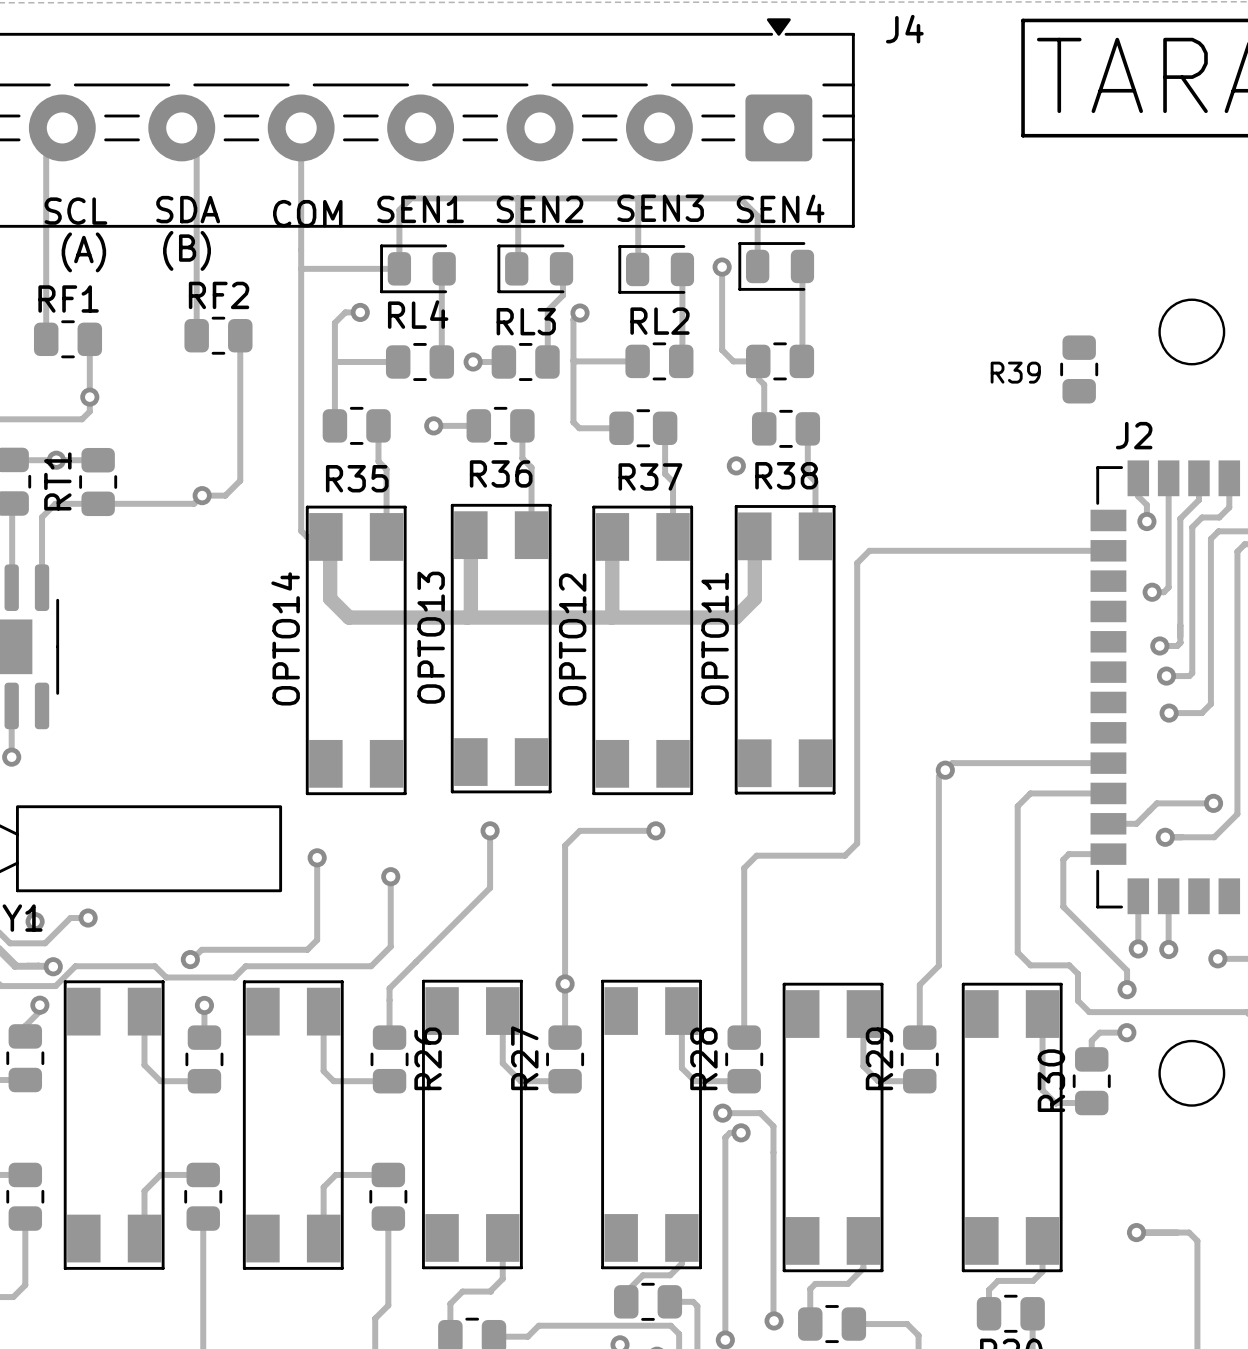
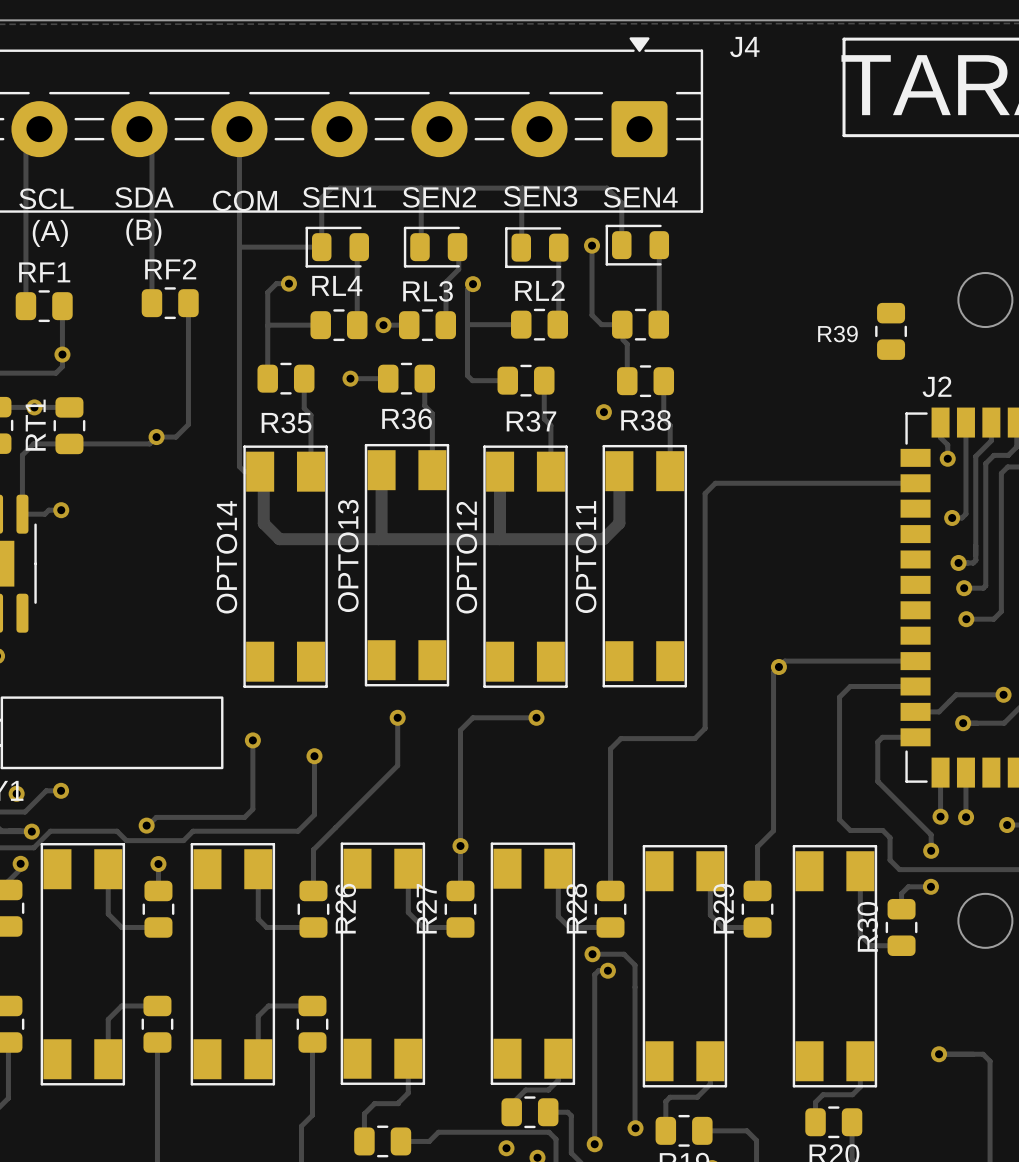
track: none -> (61, 510) (48, 510) (44, 514) (22, 514)
via: none -> (61, 510)

